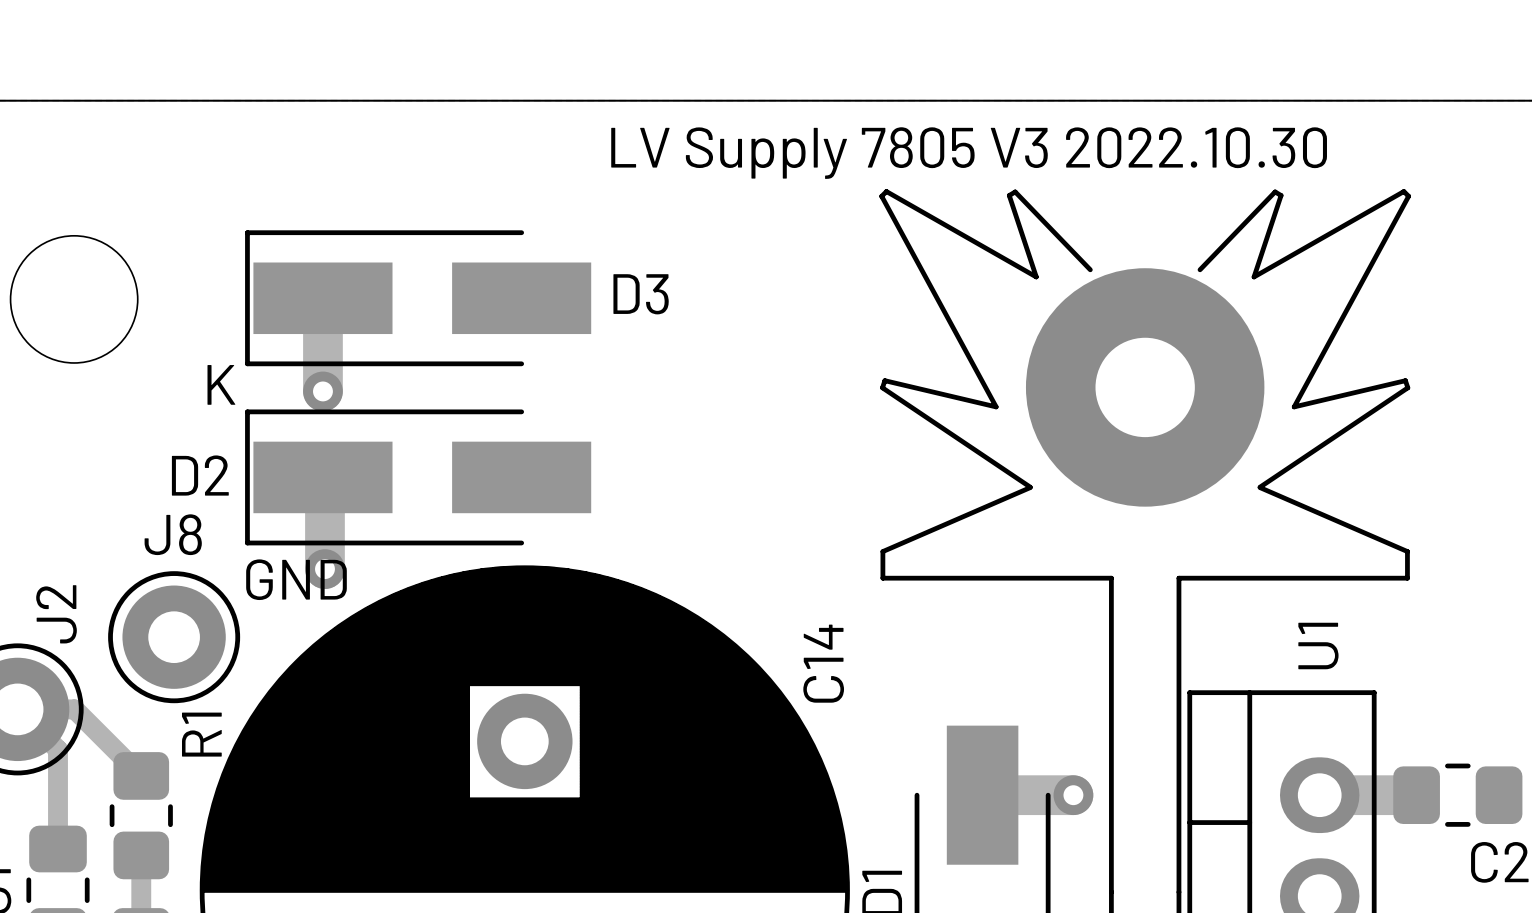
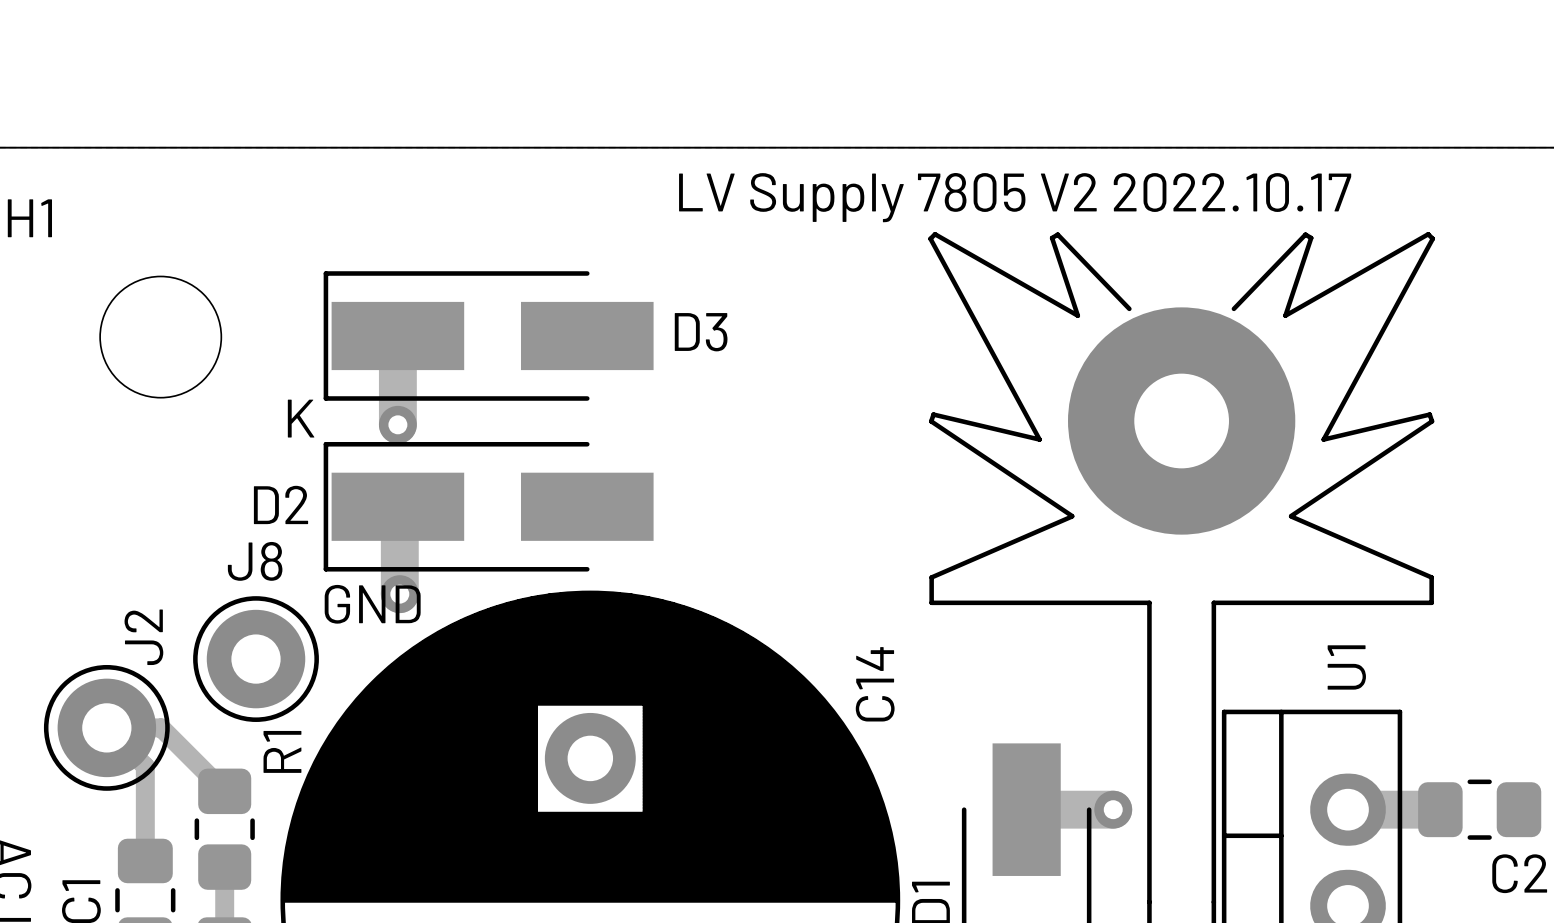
text: LV Supply 7805 V3 2022.10.30 (969, 153) -> LV Supply 7805 V2 2022.10.17 (1015, 197)

